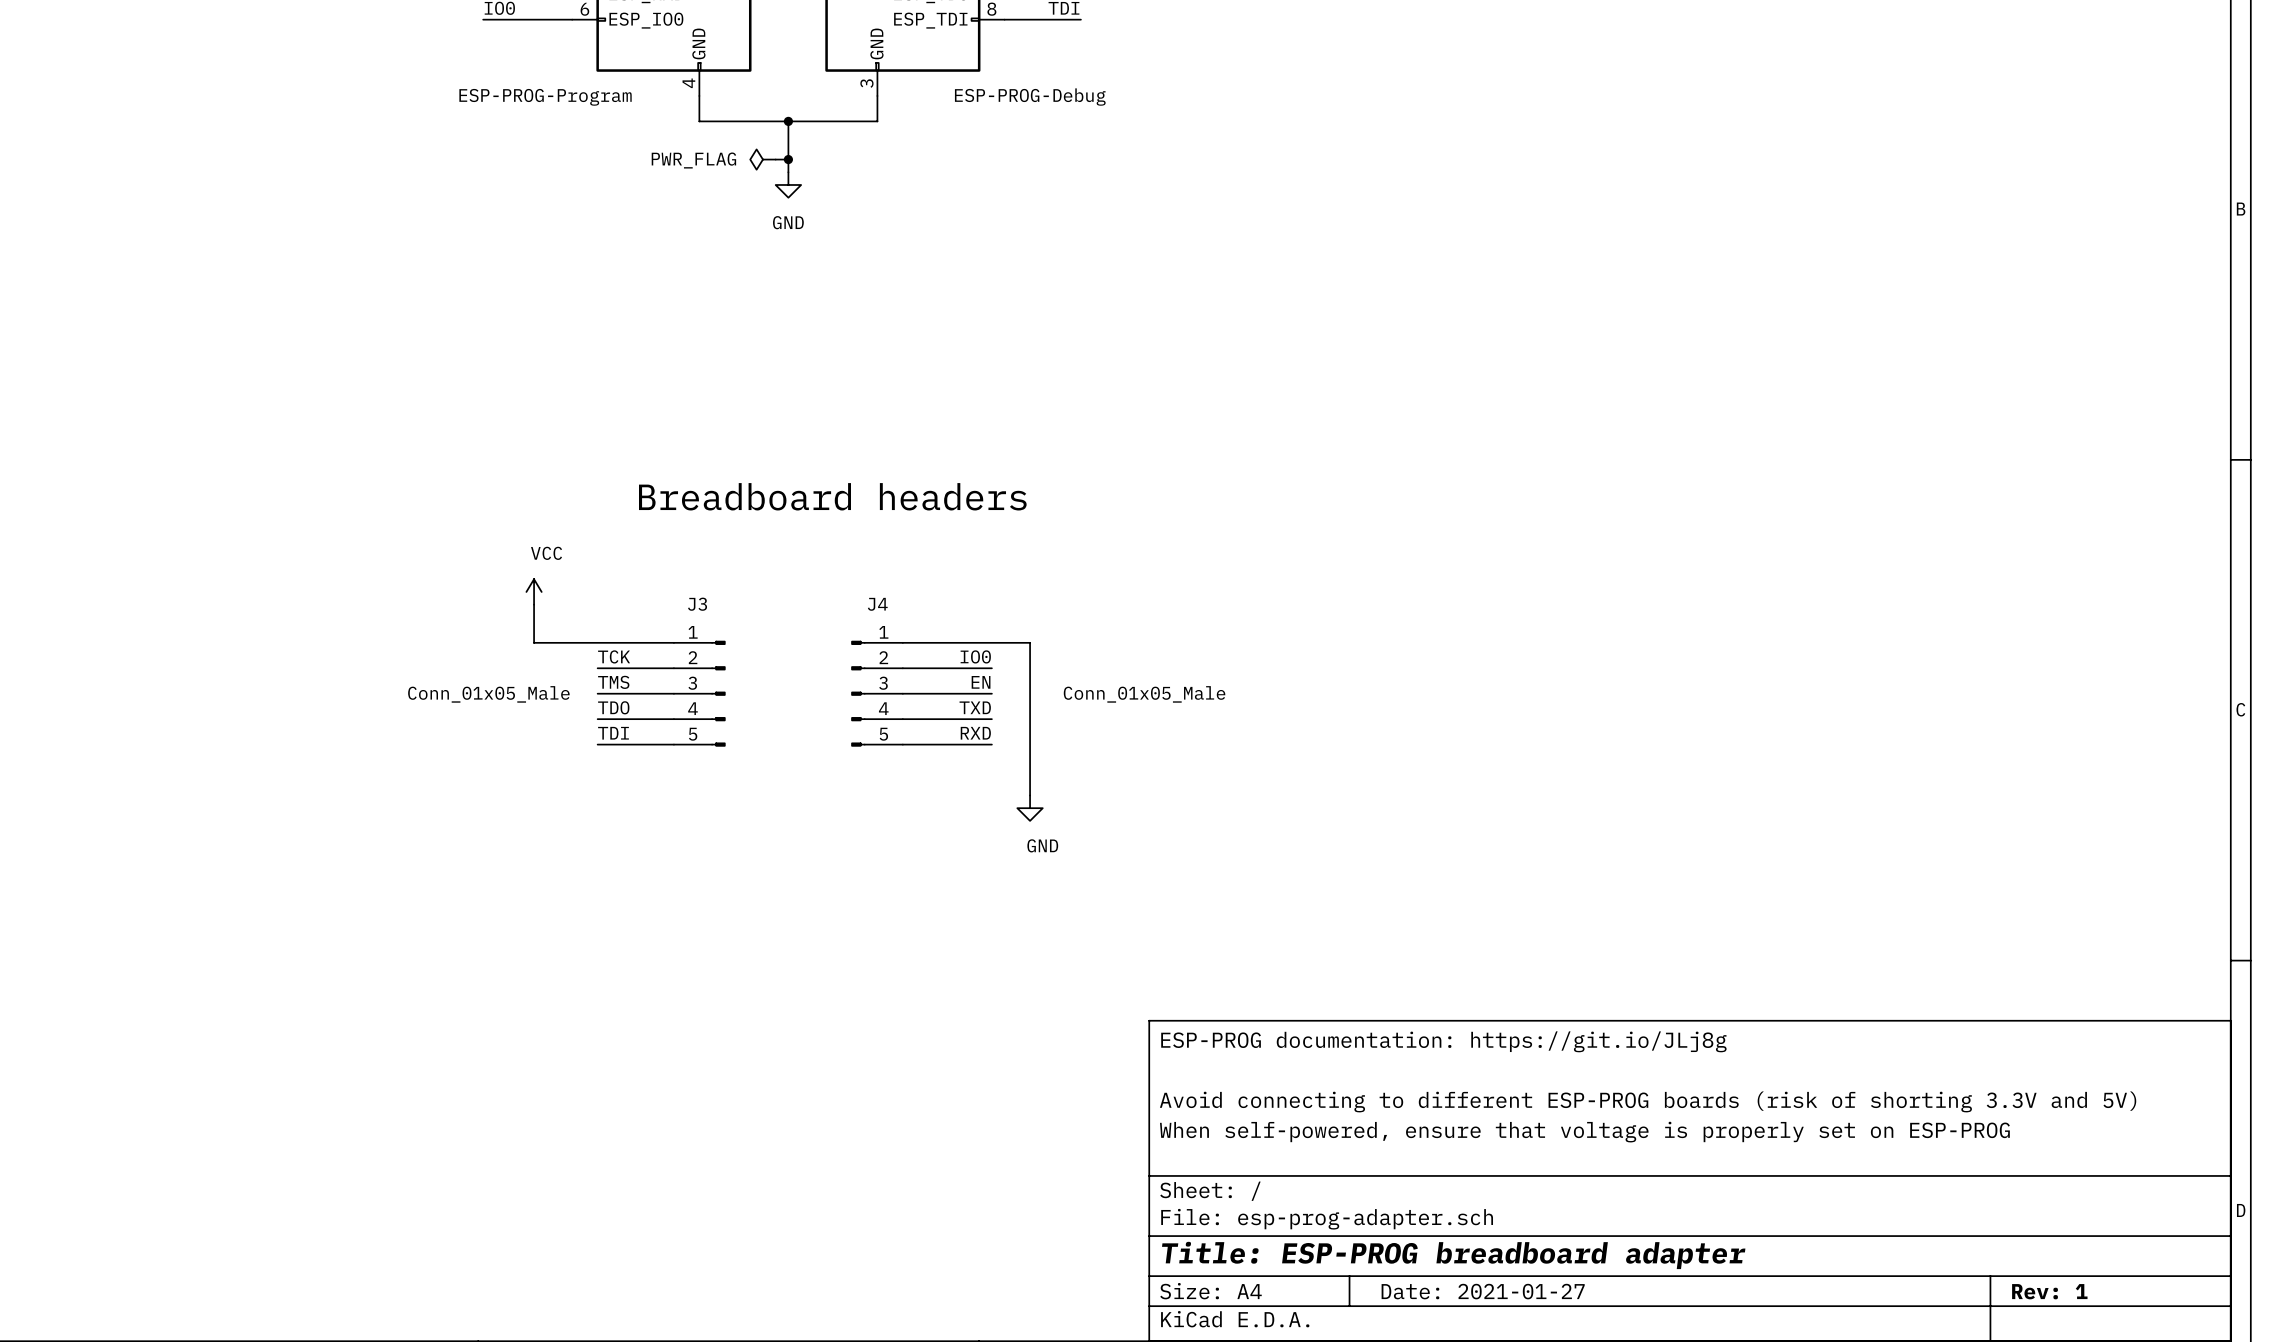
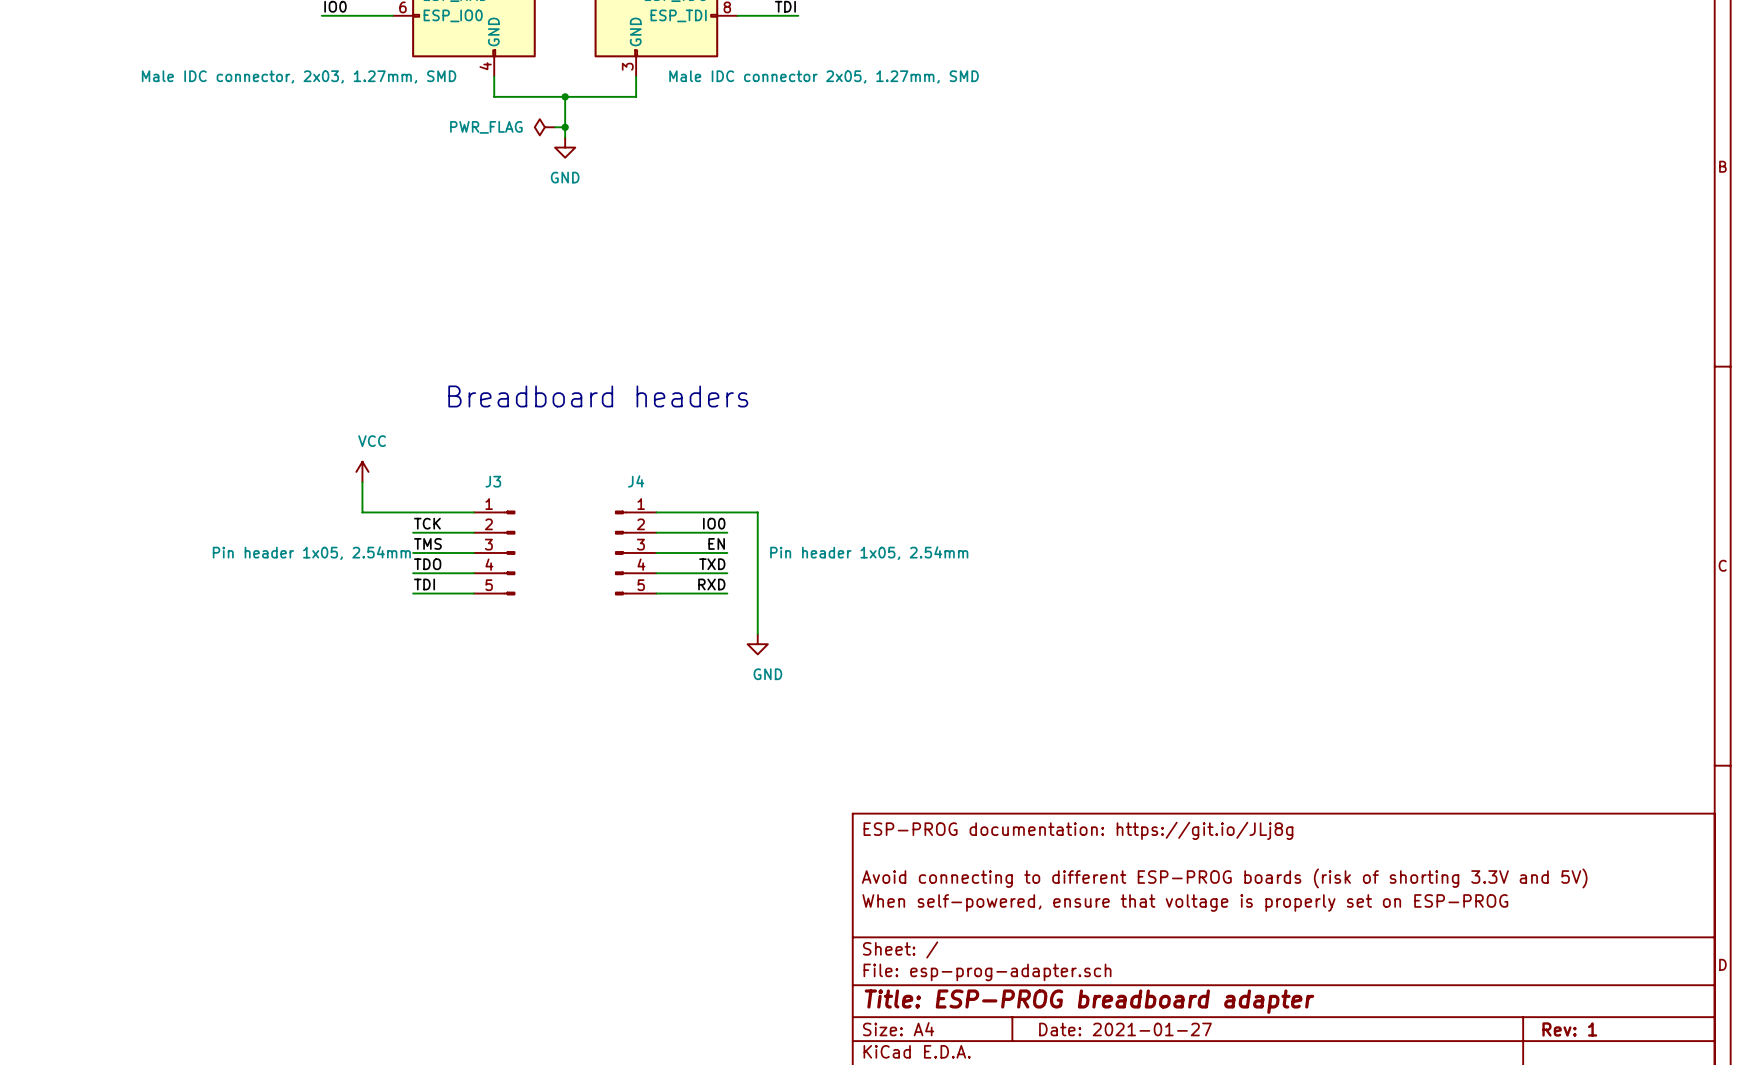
part value: ESP-PROG-Program (545, 97) -> Male IDC connector, 2x03, 1.27mm, SMD (299, 76)
part value: ESP-PROG-Debug (1030, 97) -> Male IDC connector 2x05, 1.27mm, SMD (824, 76)
J3 value: Conn_01x05_Male (488, 694) -> Pin header 1x05, 2.54mm (311, 553)
J4 value: Conn_01x05_Male (1144, 694) -> Pin header 1x05, 2.54mm (869, 553)

